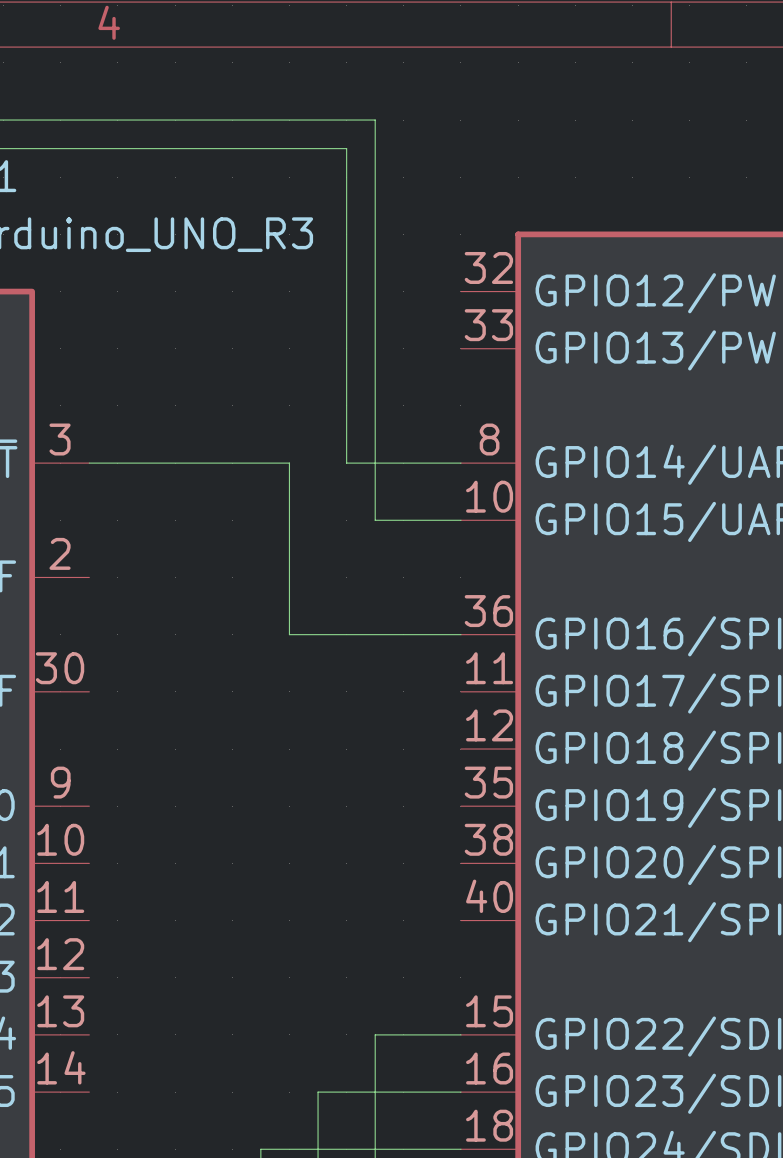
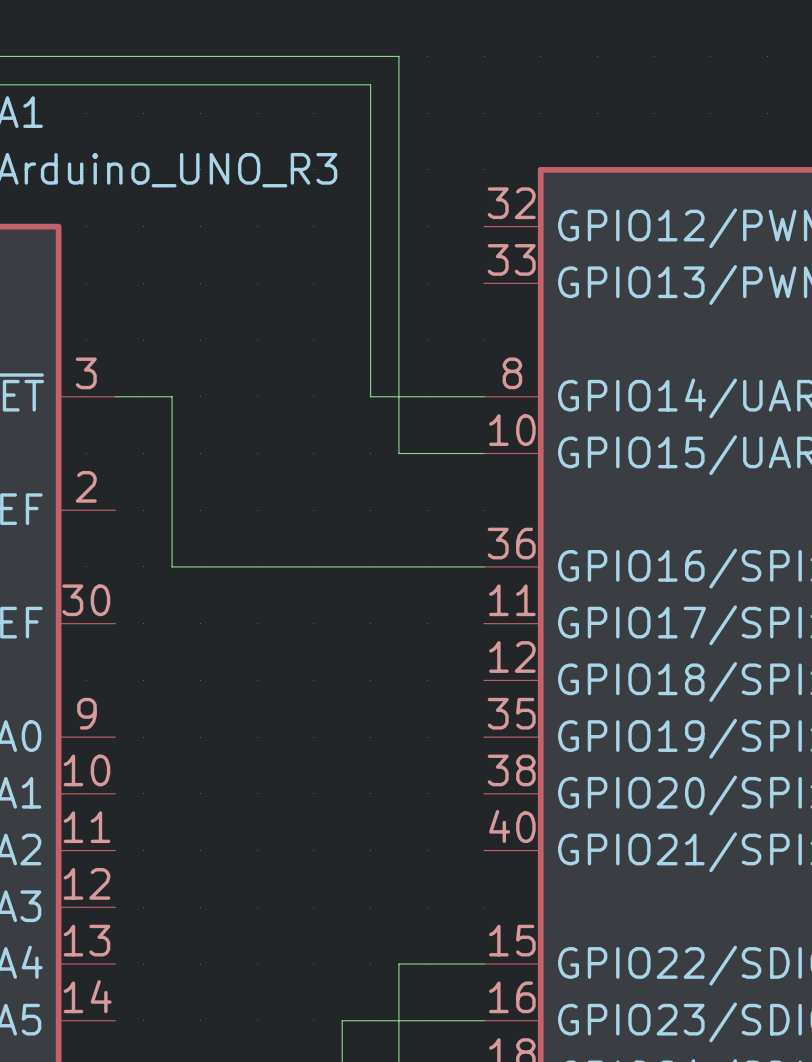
wire: (146, 463) (289, 463) (289, 634) -> (172, 396) (172, 566) (313, 566)

